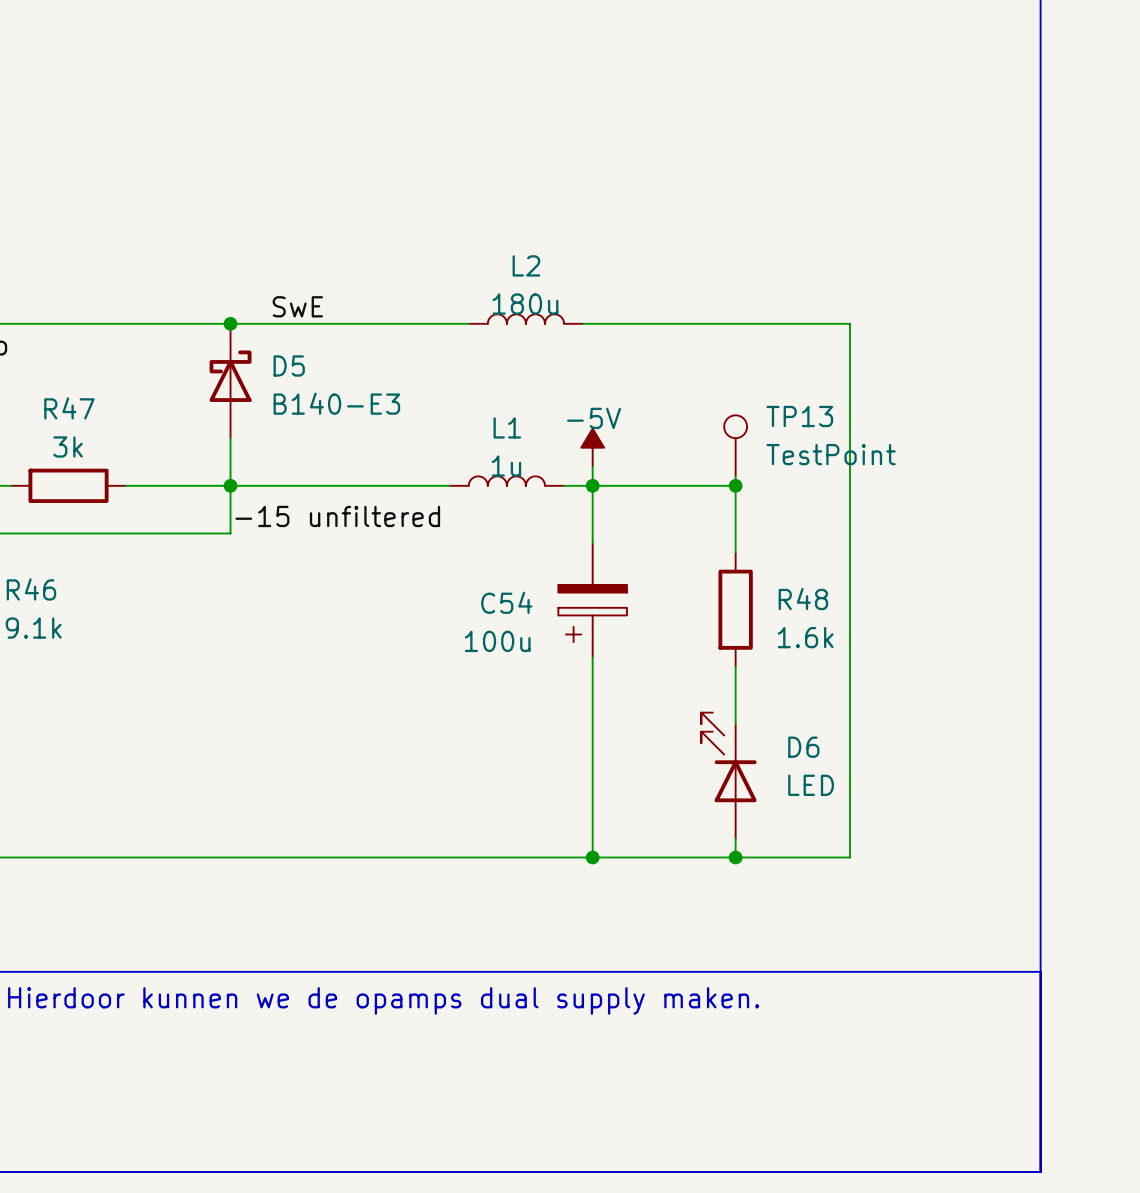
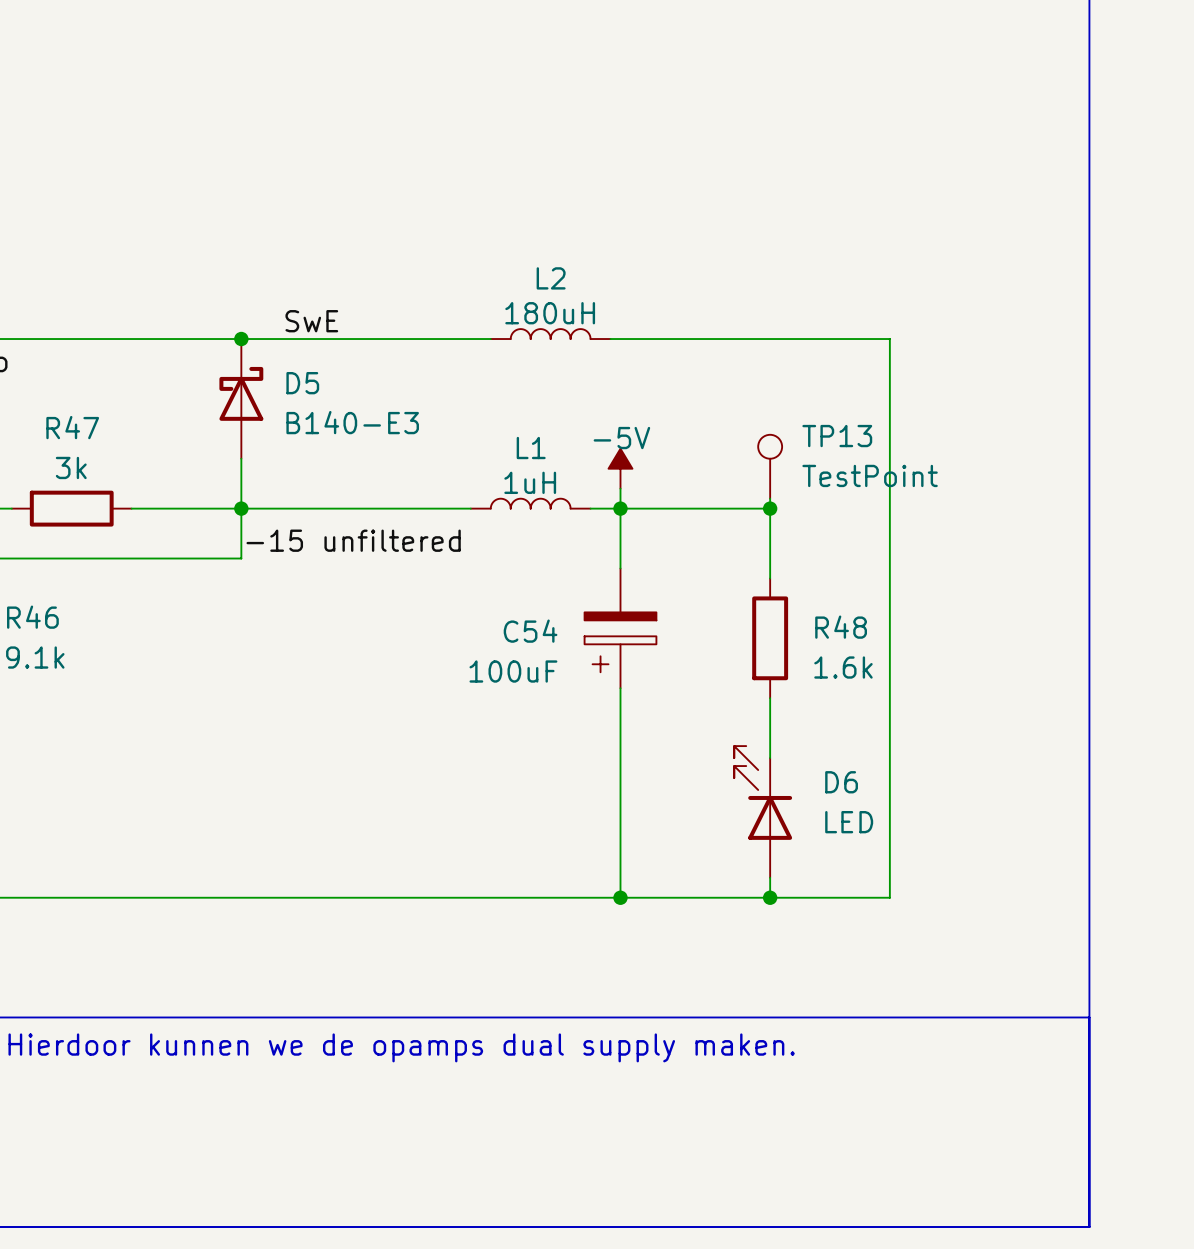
L2 value: 180u (525, 304) -> 180uH (550, 313)
L1 value: 1u (506, 466) -> 1uH (530, 482)
C54 value: 100u (497, 641) -> 100uF (513, 671)

